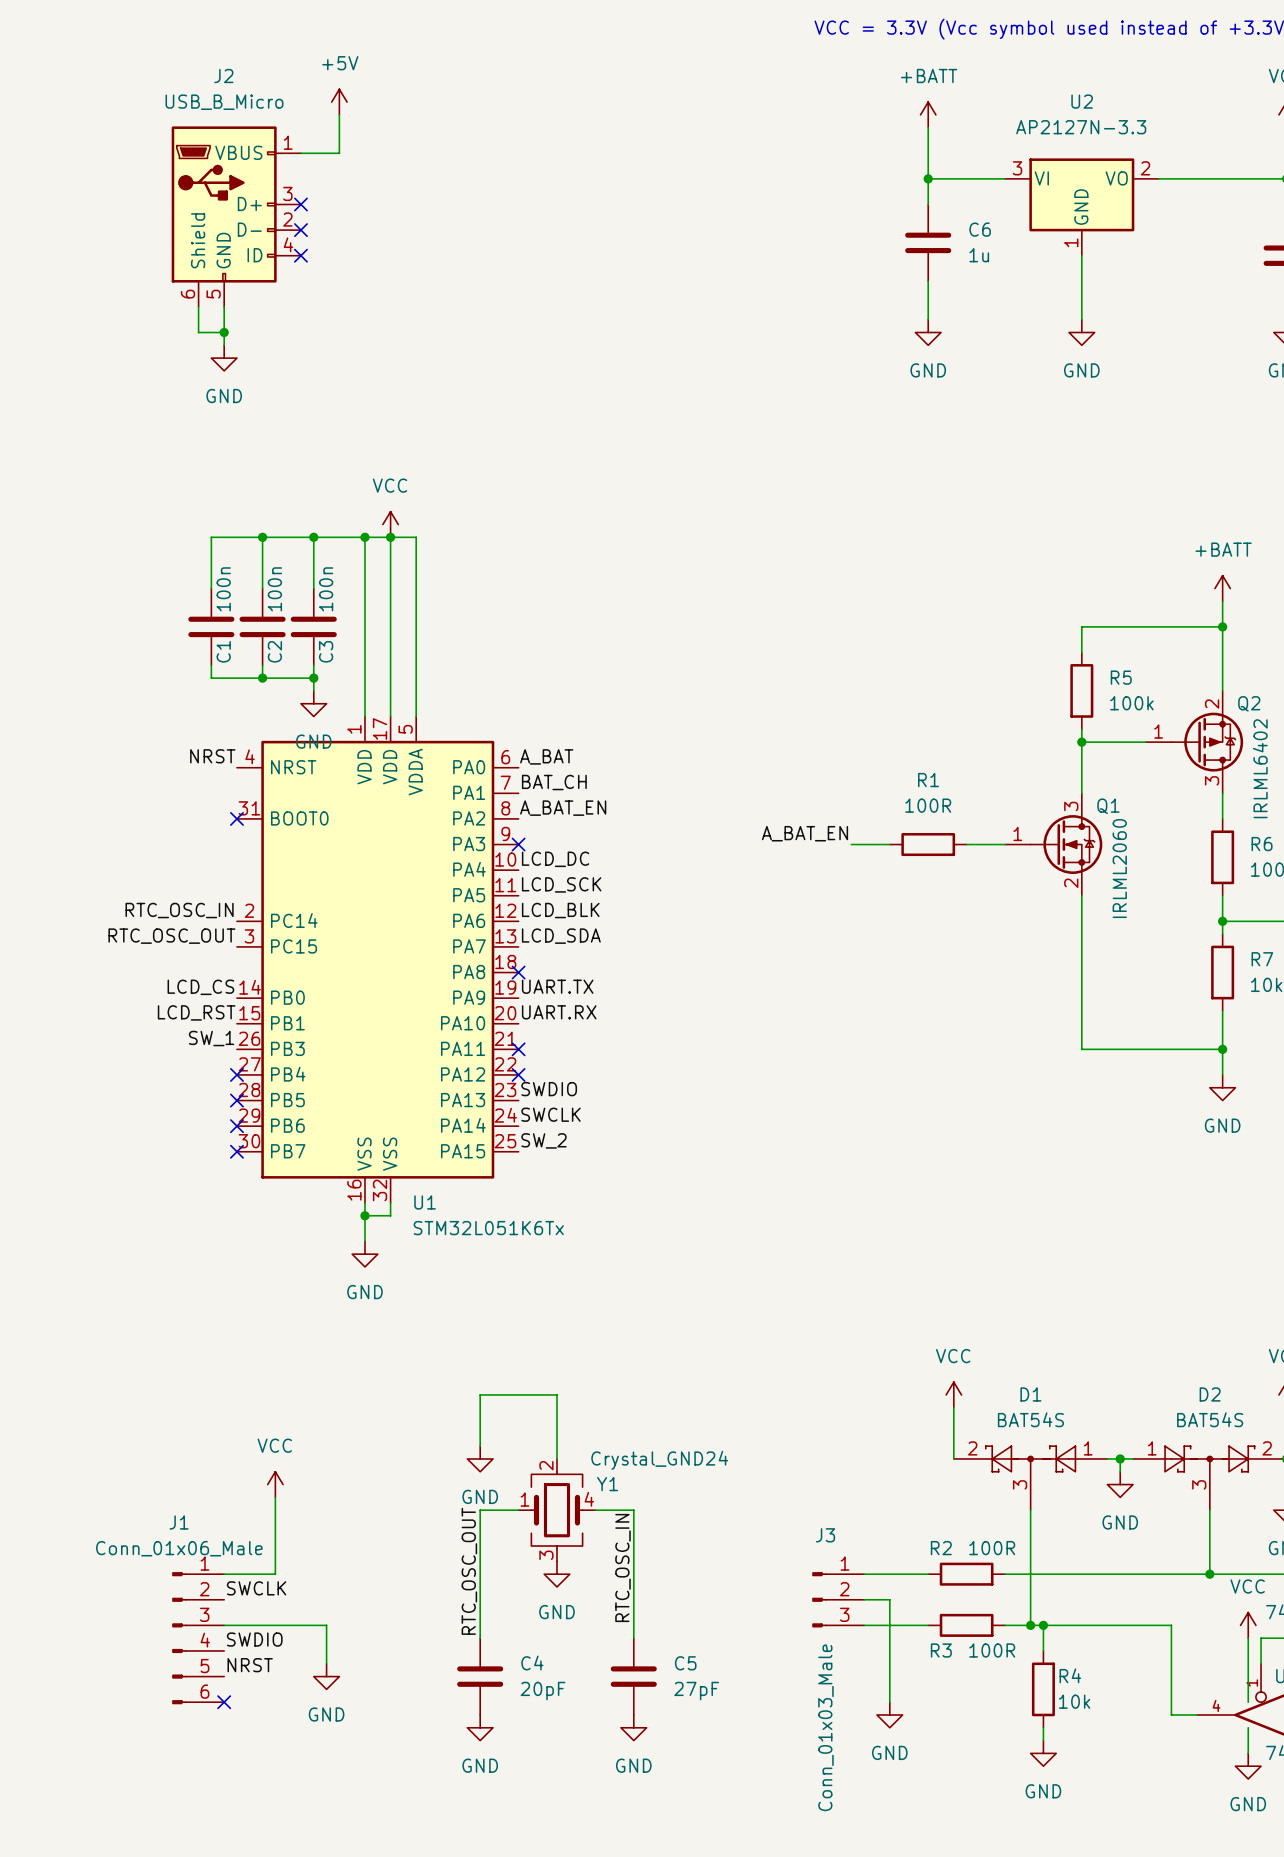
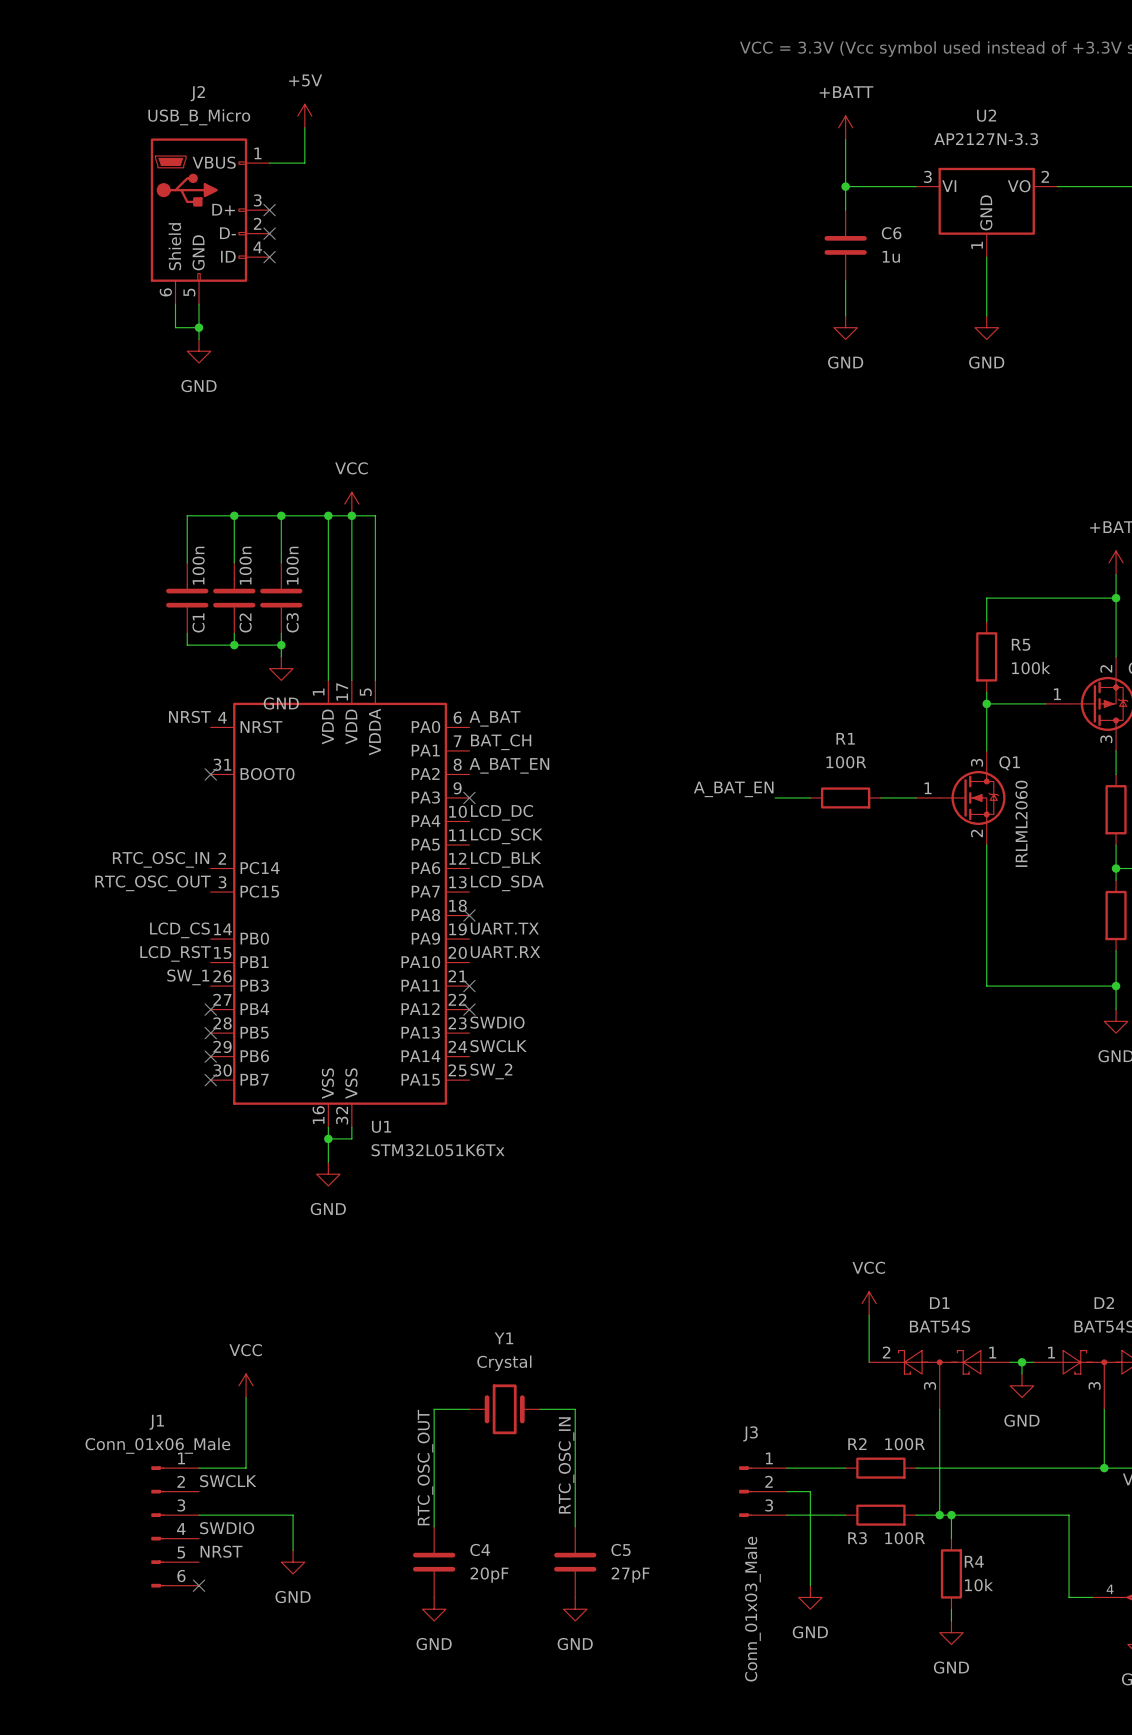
wire: (480, 1446) (480, 1394) (556, 1394) (556, 1458) -> none
power symbol: GND (480, 1458) -> none
Y1 symbol: [518, 1458, 596, 1562] -> [469, 1384, 540, 1435]
Y1 value: Crystal_GND24 (659, 1460) -> Crystal (504, 1363)
Y1 name position: Y1 (607, 1484) -> Y1 (503, 1338)
power symbol: GND (556, 1574) -> none

